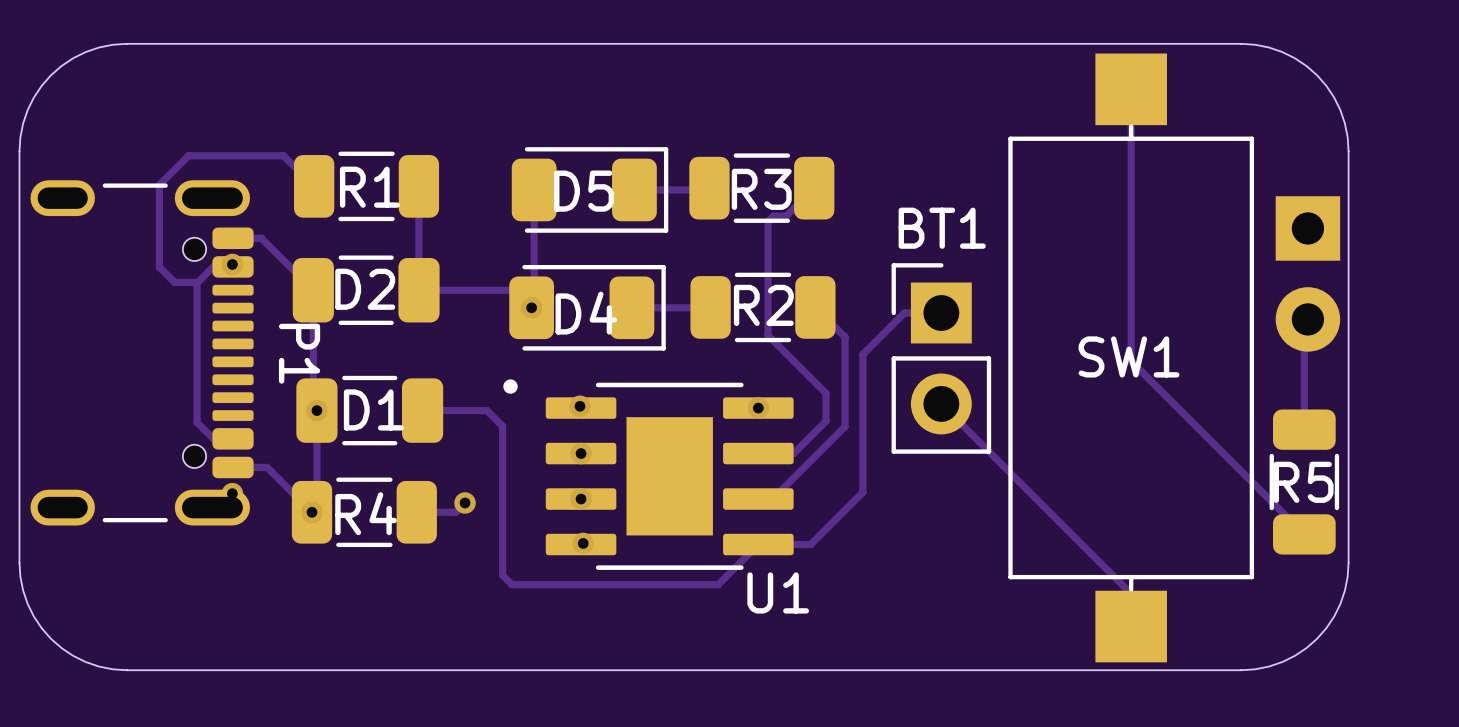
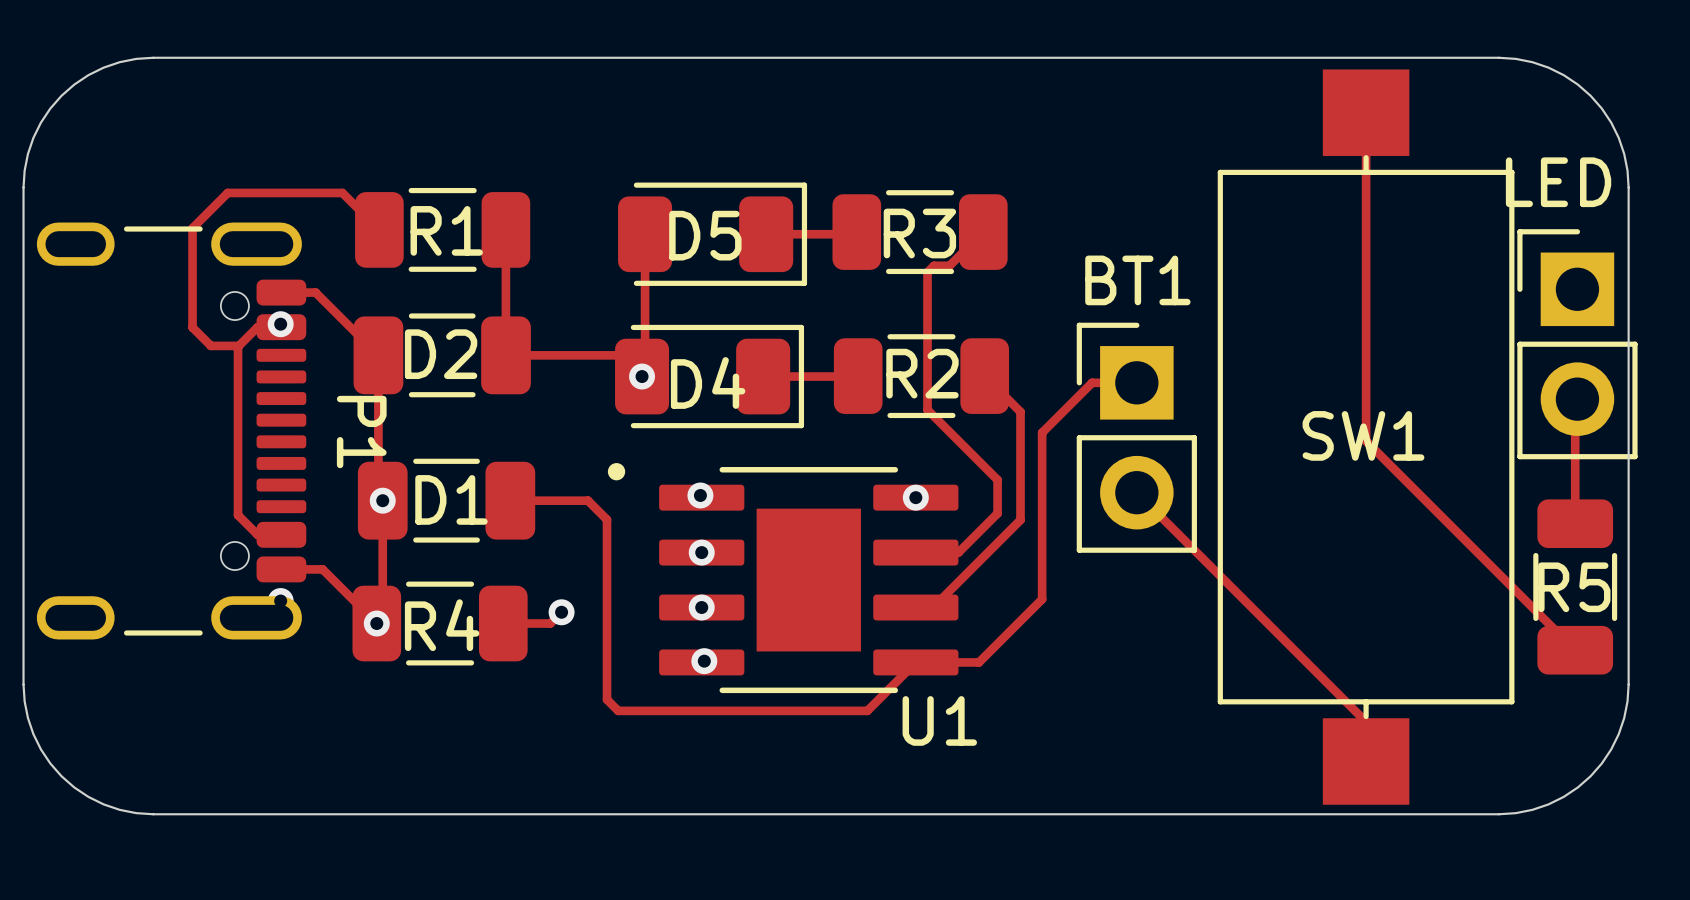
part: (1307, 273) -> none
LED: none -> (1577, 344)

